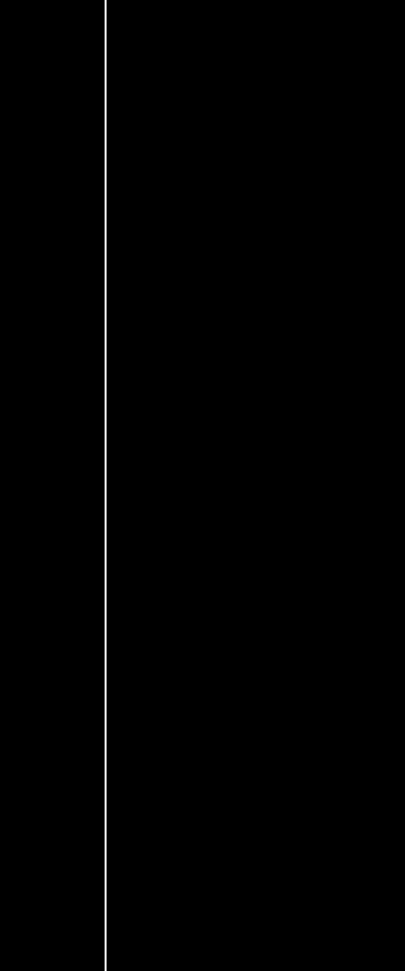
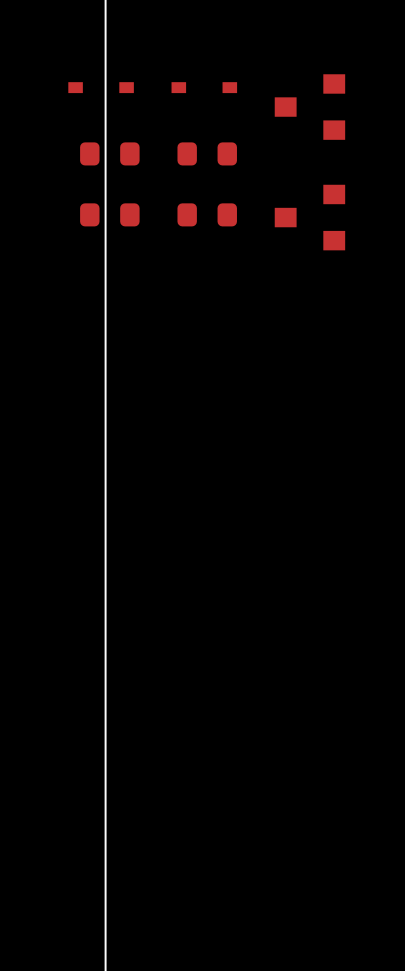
part: none -> (101, 87)
part: none -> (204, 87)
part: none -> (309, 107)
part: none -> (109, 153)
part: none -> (207, 153)
part: none -> (109, 214)
part: none -> (207, 214)
part: none -> (309, 217)

